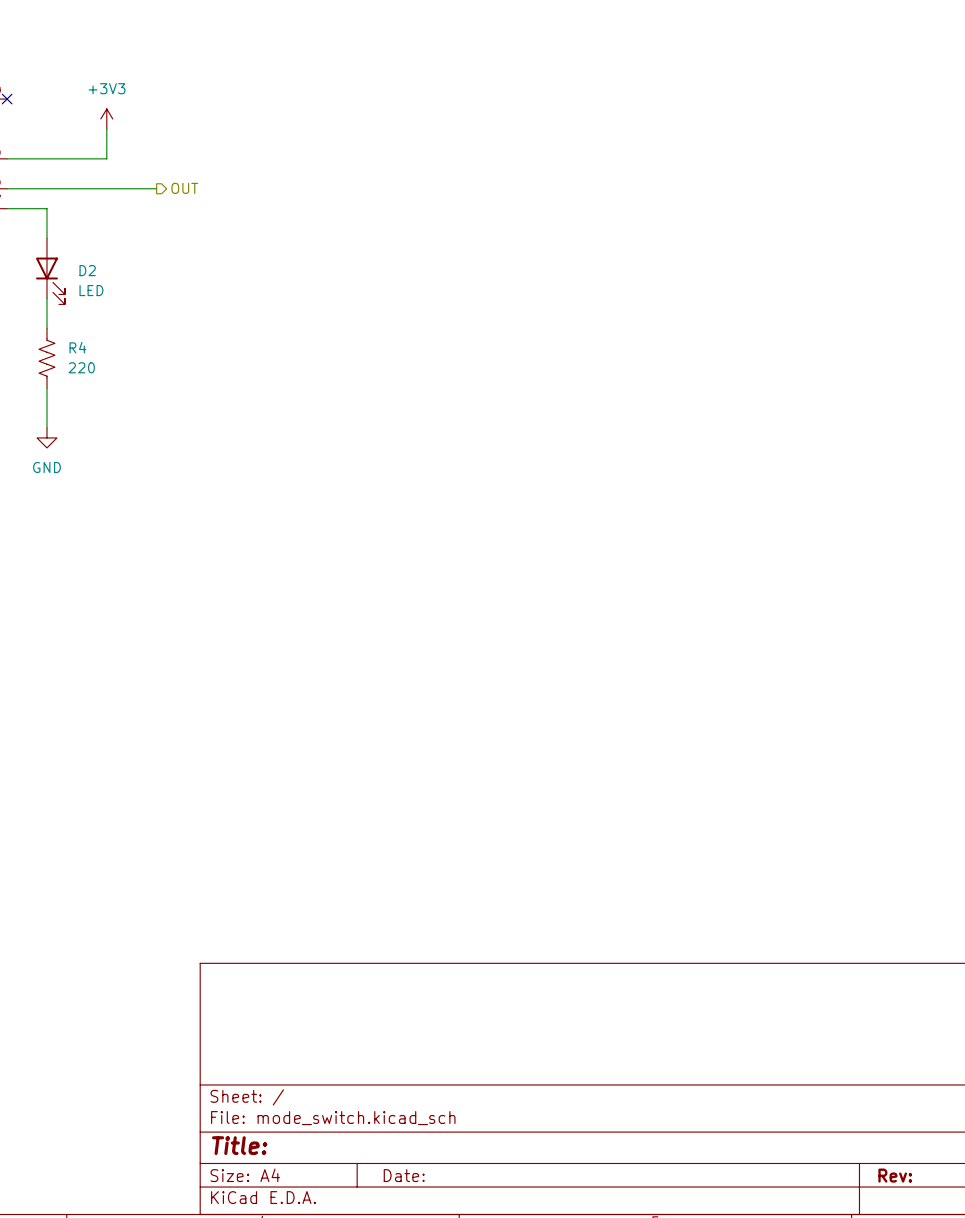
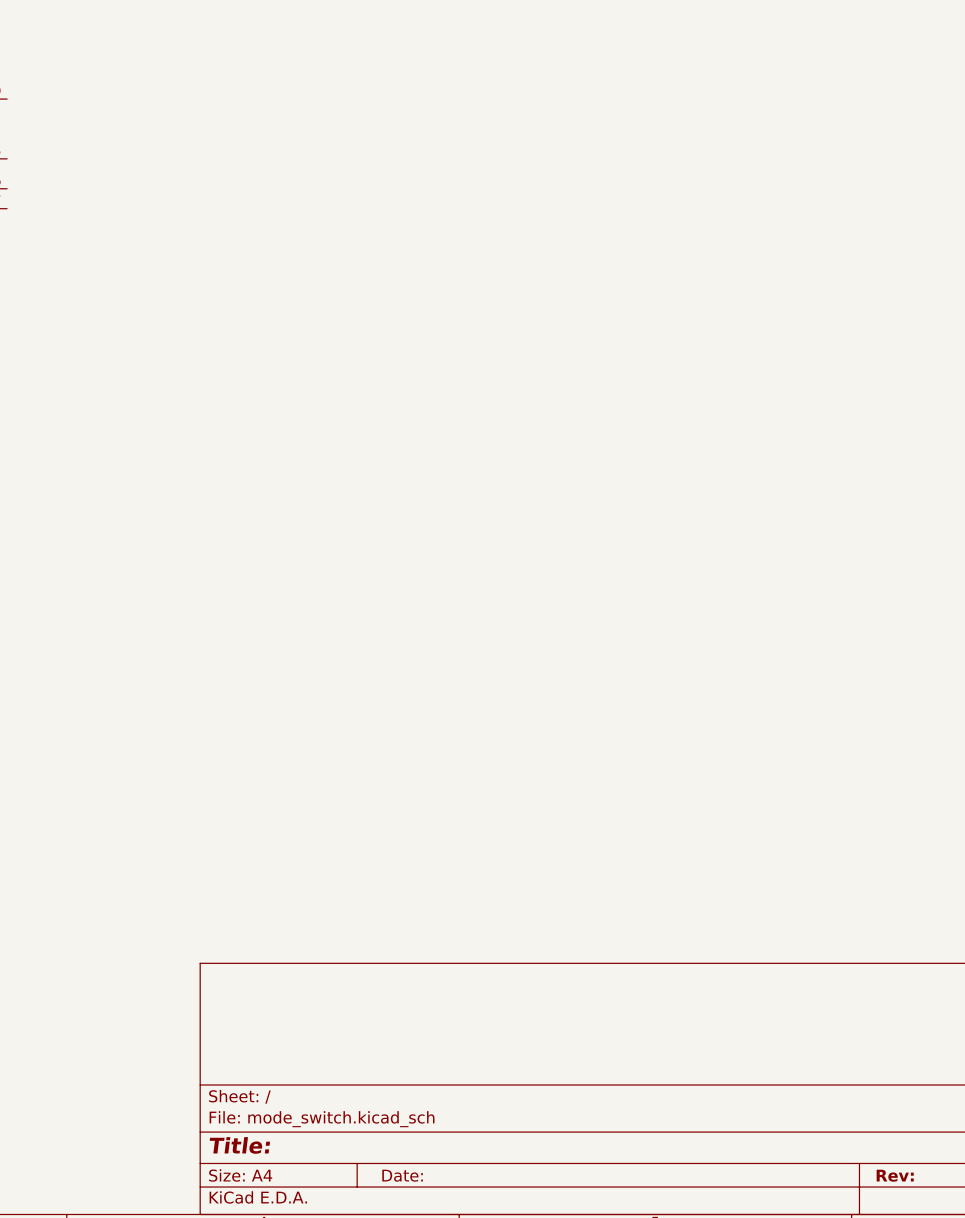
no-connect mark: (7, 99) -> none
power symbol: +3V3 (106, 118) -> none
wire: (106, 128) (106, 158) (7, 158) -> none
wire: (7, 188) (156, 188) -> none
hierarchical label: OUT (184, 188) -> none
wire: (7, 208) (46, 208) (46, 238) -> none
D2: LED (50, 271) -> none
wire: (46, 298) (46, 328) -> none
R4: 220 (46, 358) -> none
wire: (46, 388) (46, 427) -> none
power symbol: GND (46, 437) -> none

